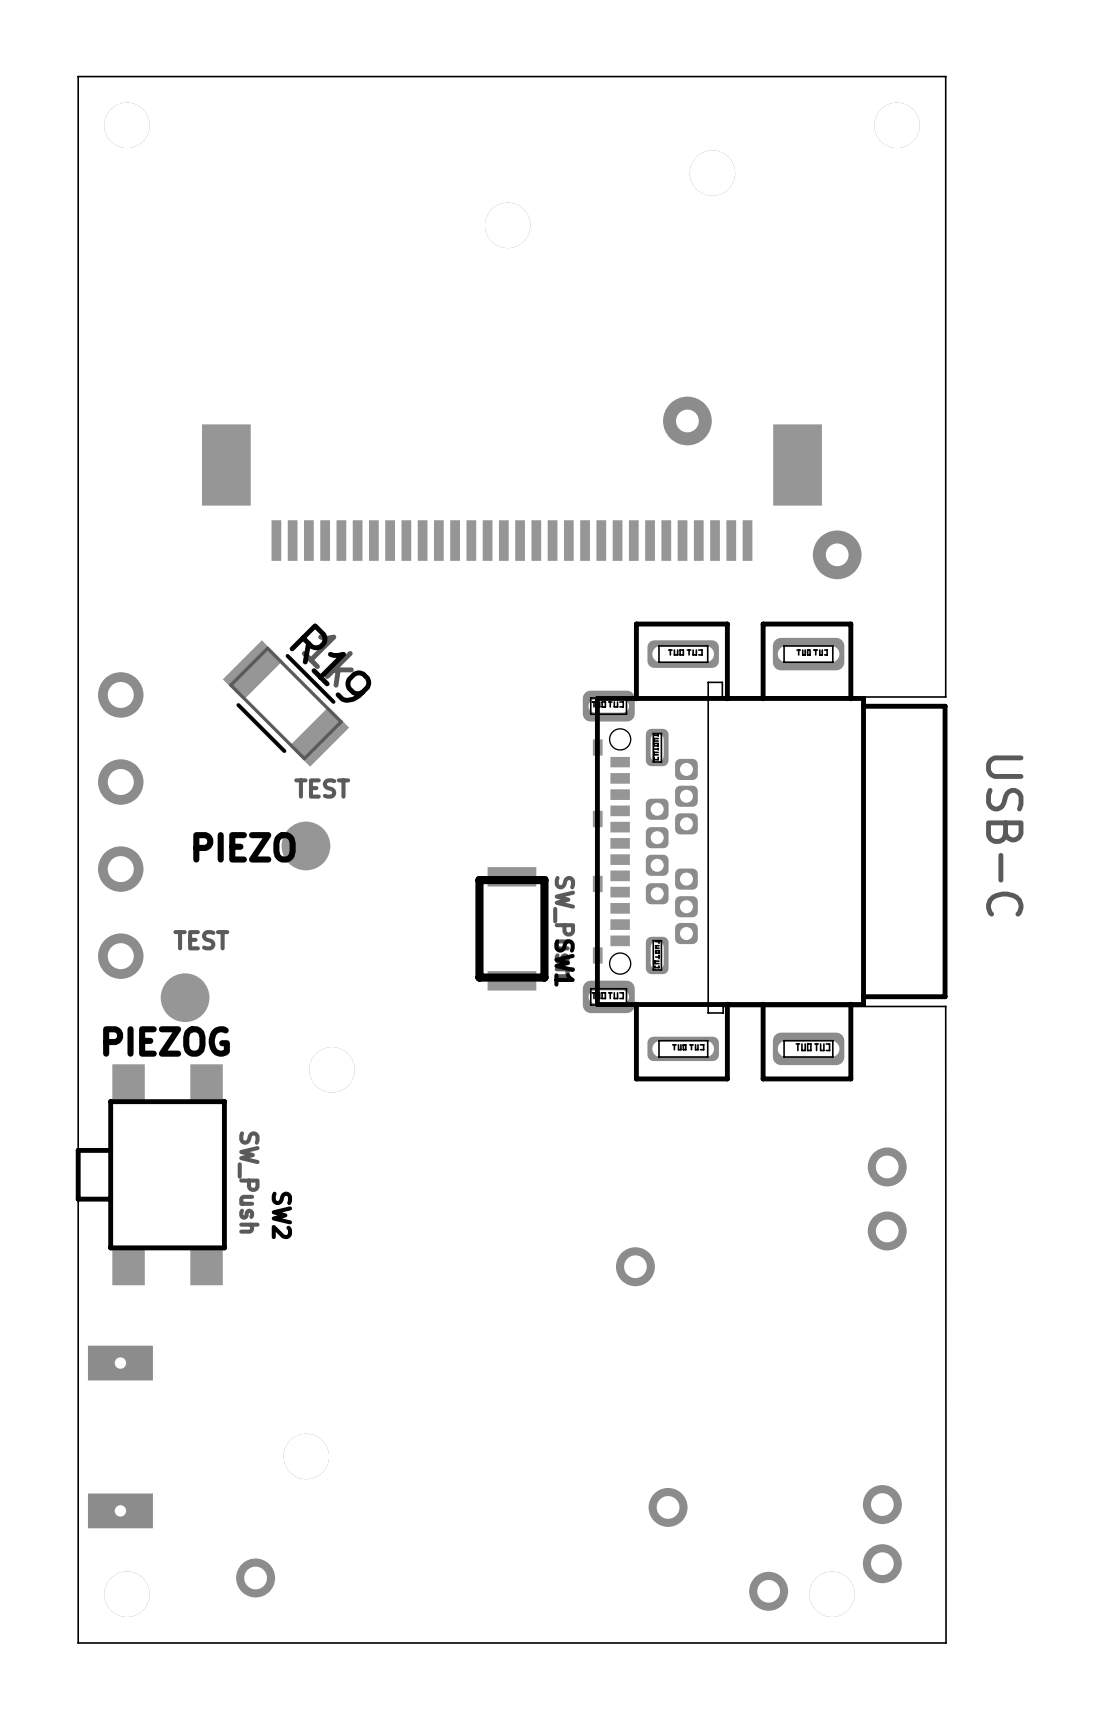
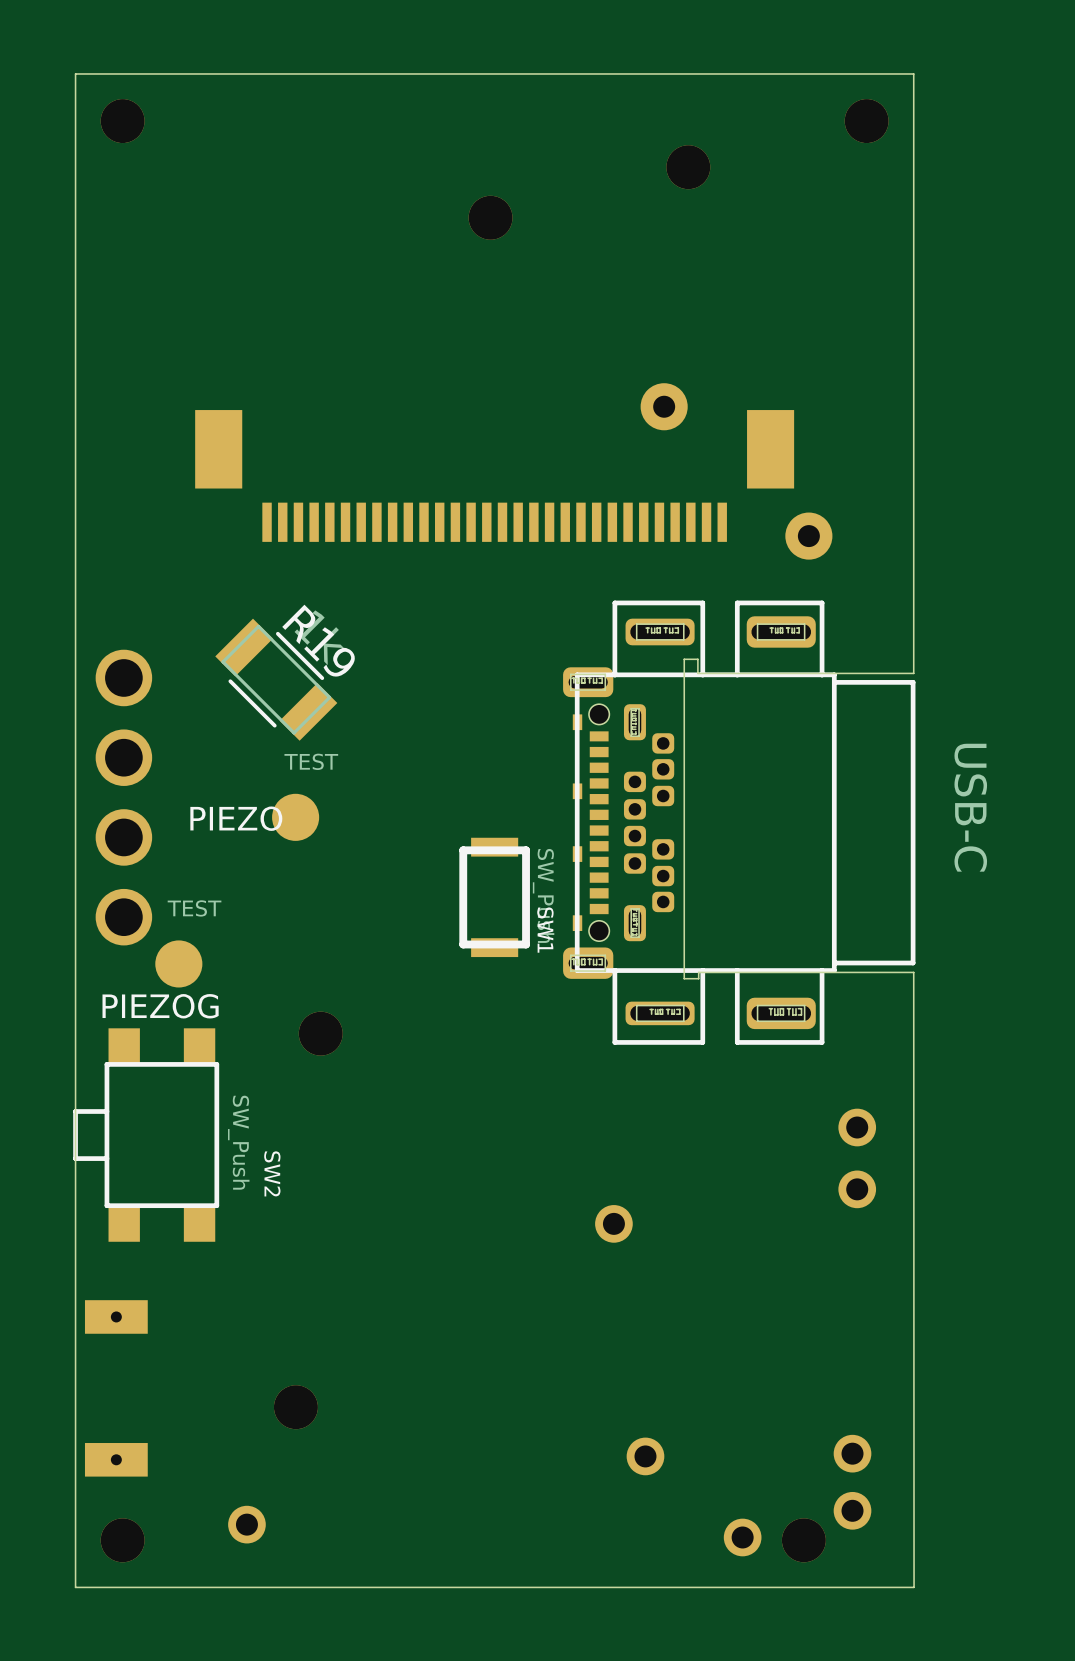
part footprint: [98, 672, 144, 979] -> [95, 649, 153, 946]

